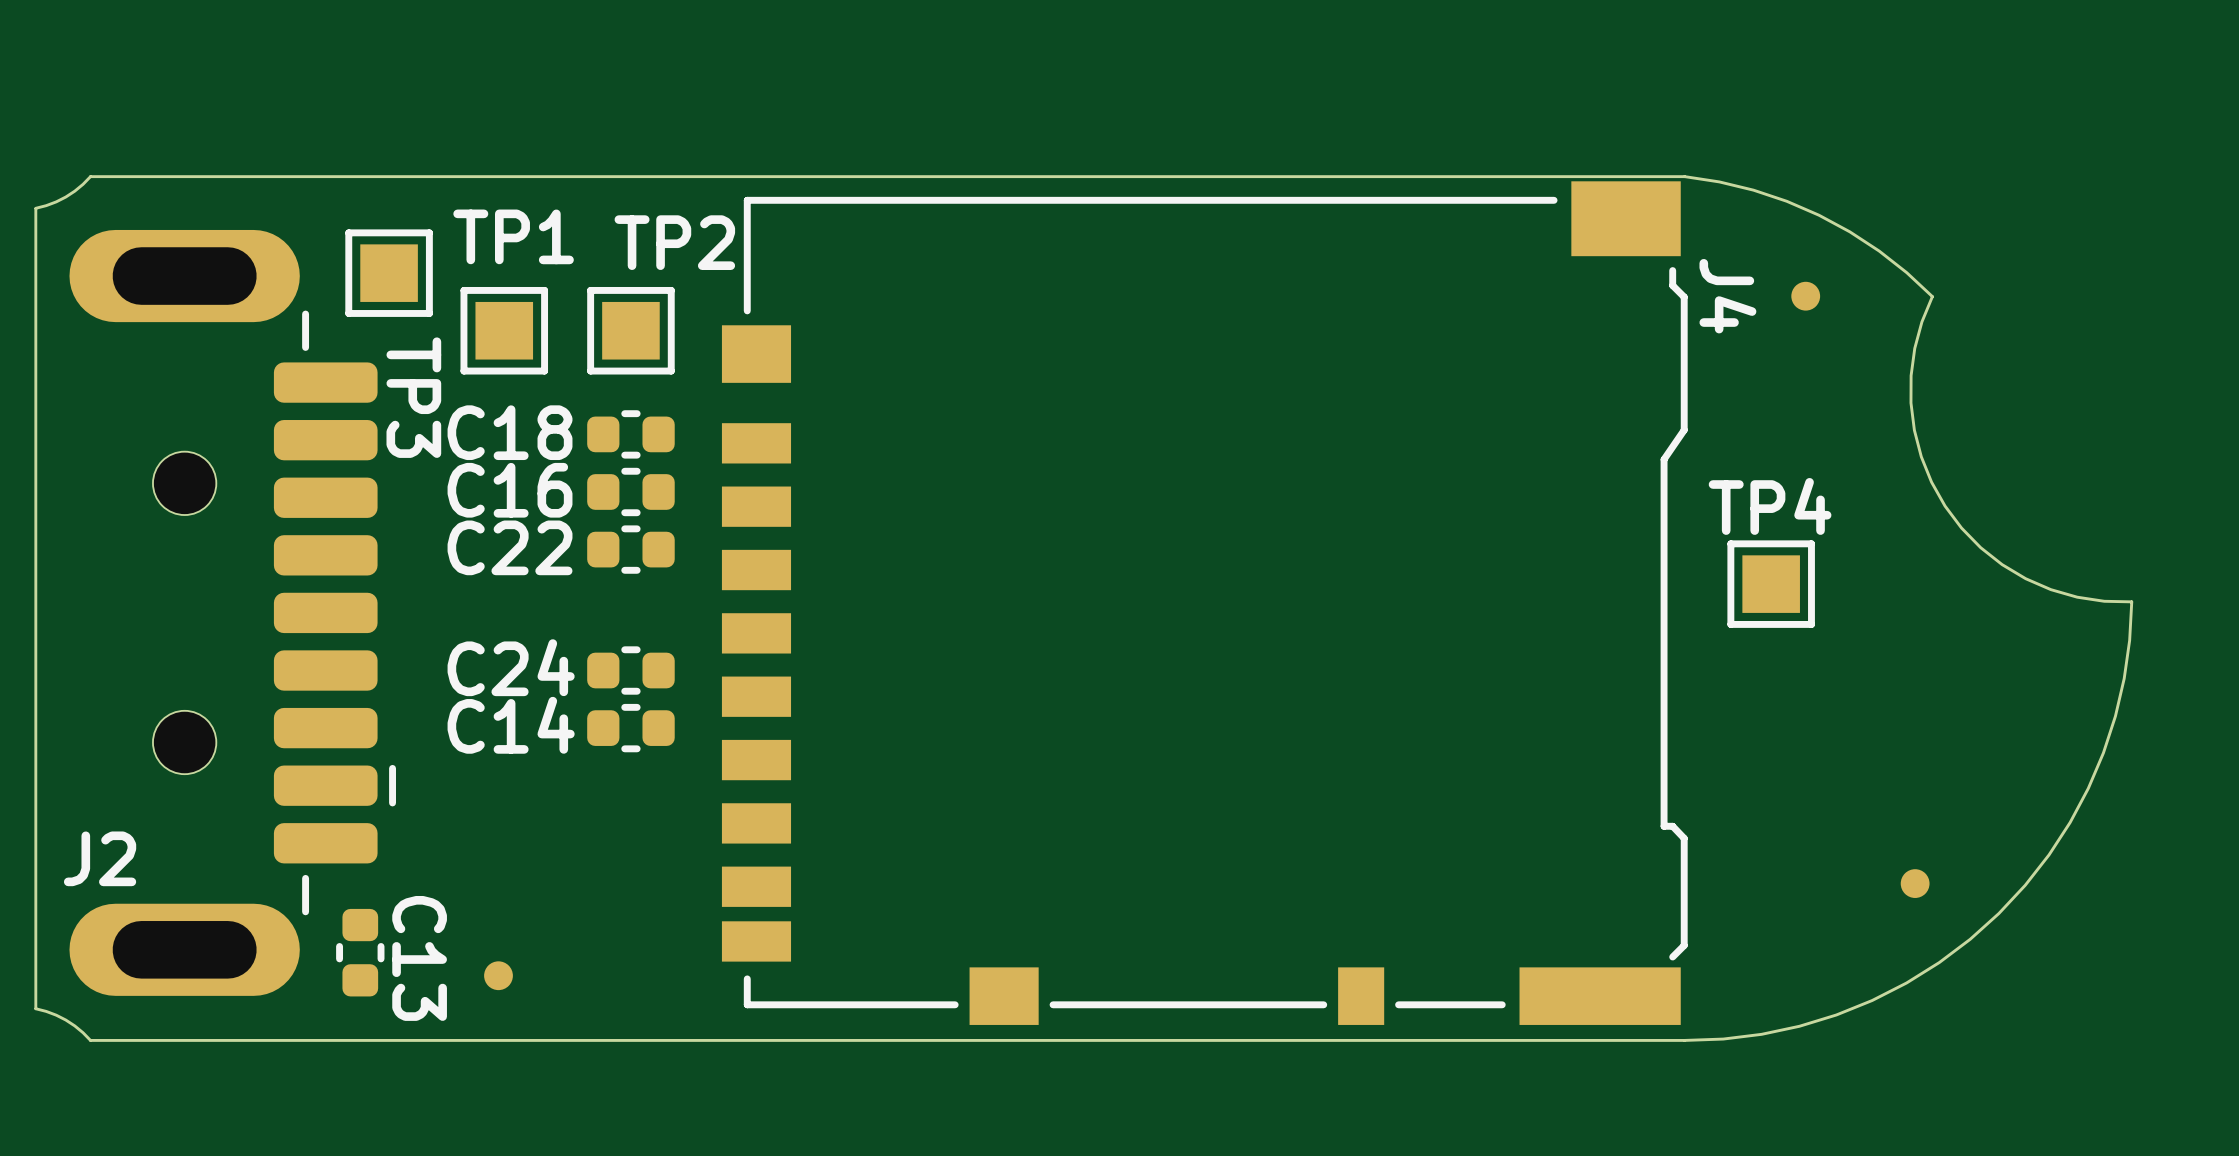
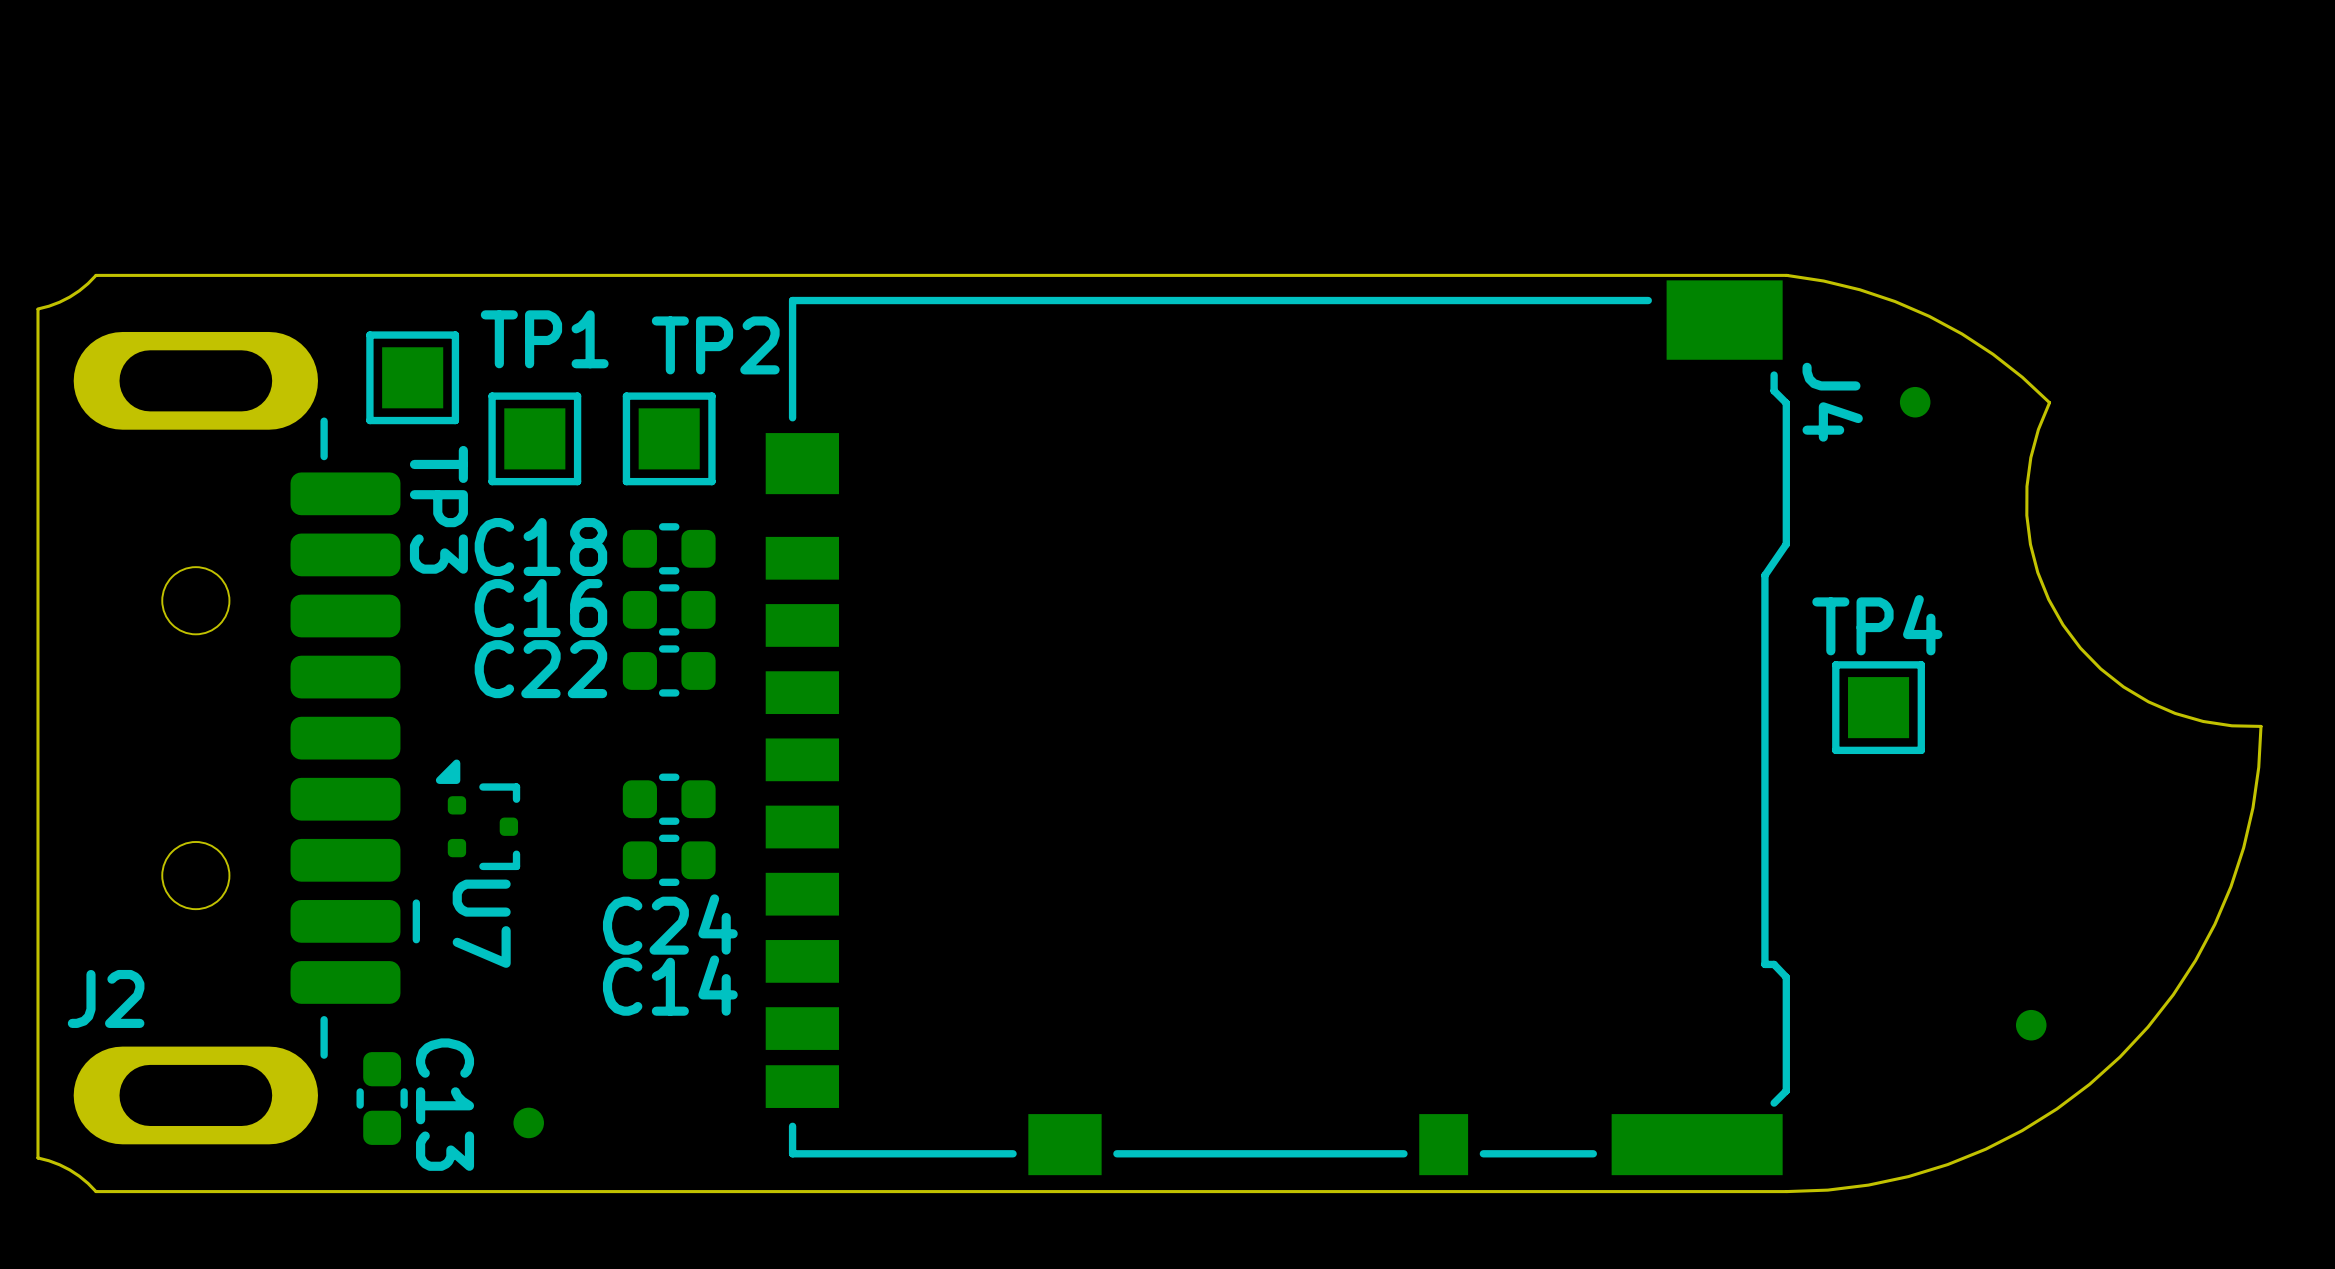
C24 name position: C24 (511, 667) -> C24 (670, 924)
U7: none -> (478, 814)
C14 name position: C14 (511, 725) -> C14 (670, 985)

